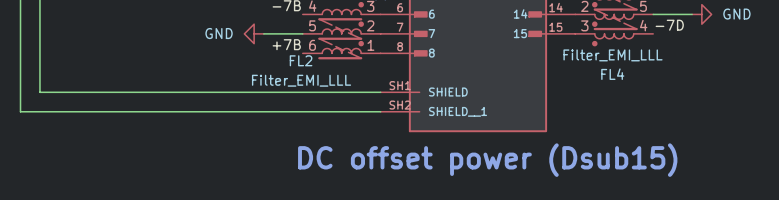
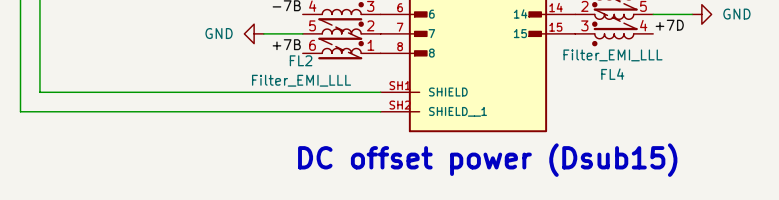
label: -7D (669, 25) -> +7D (669, 25)

